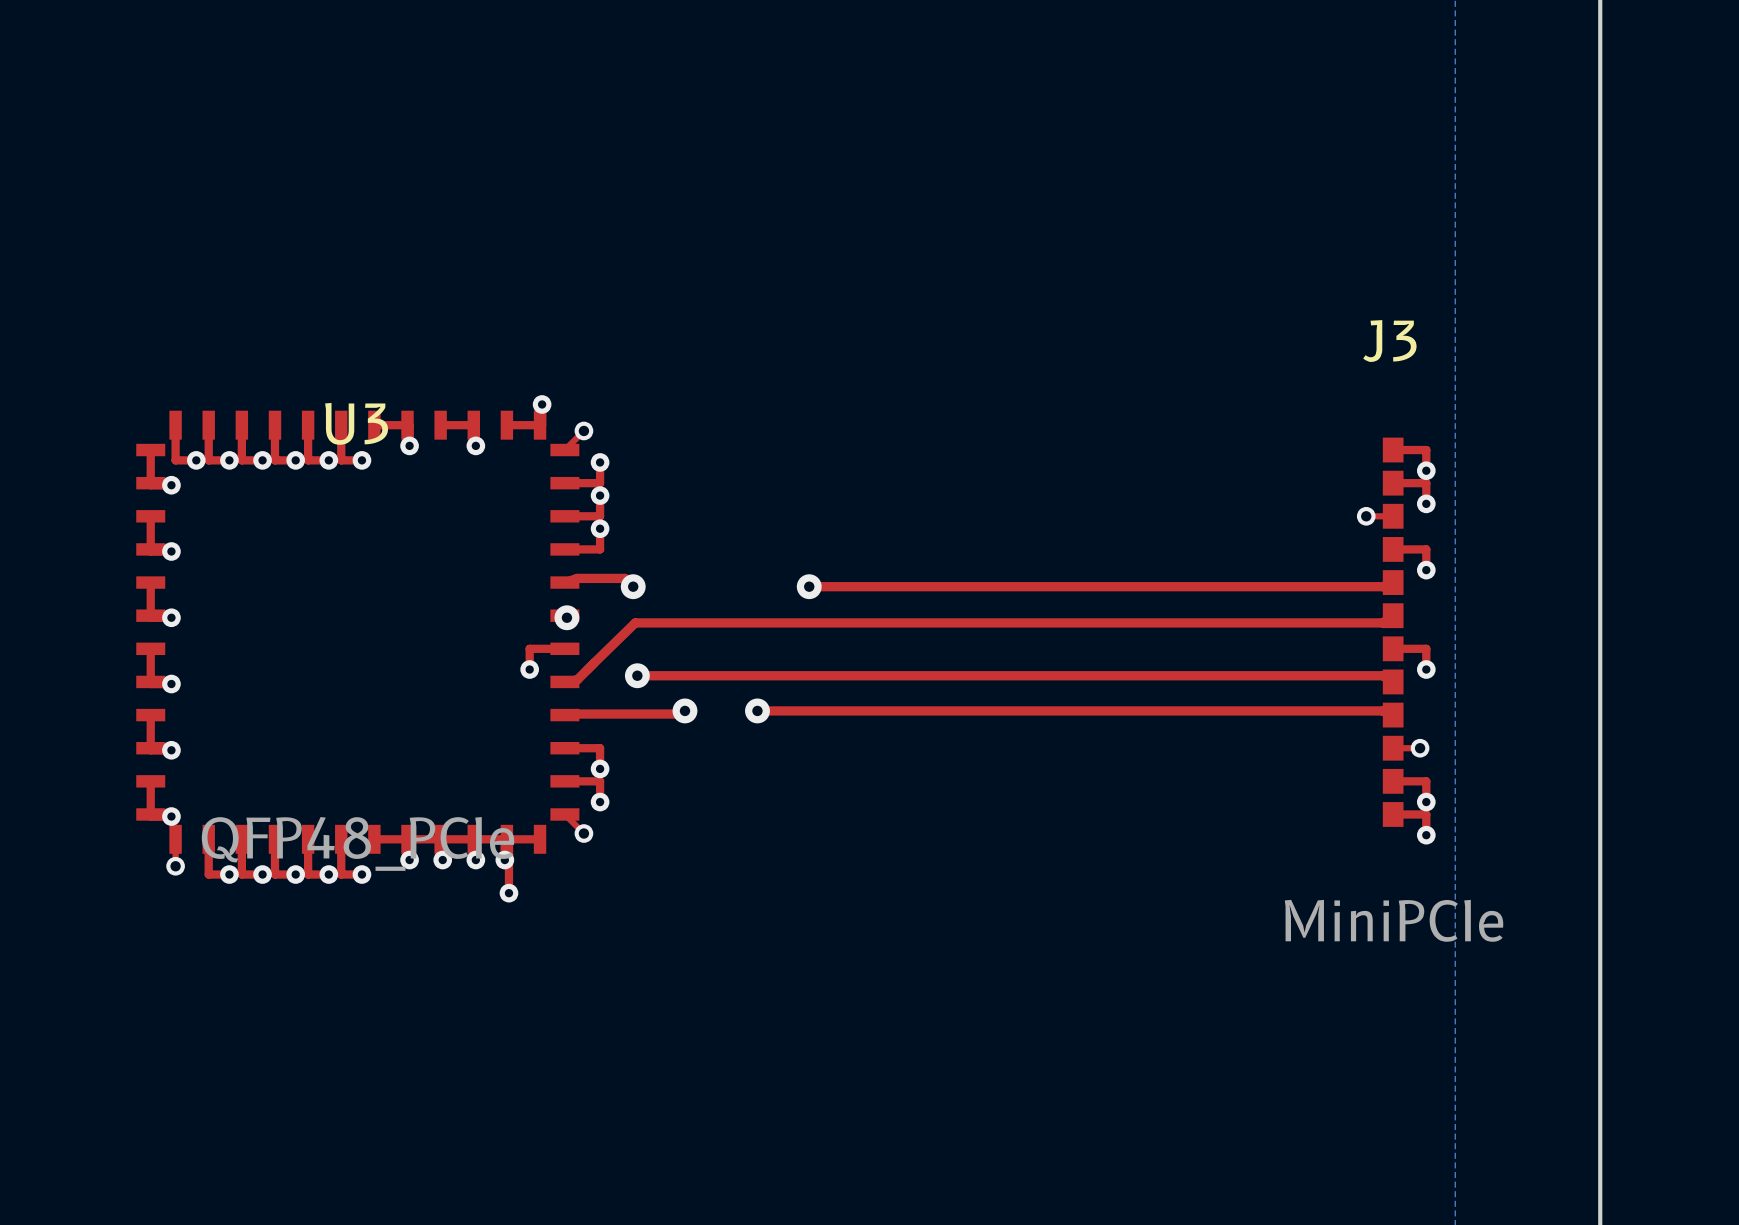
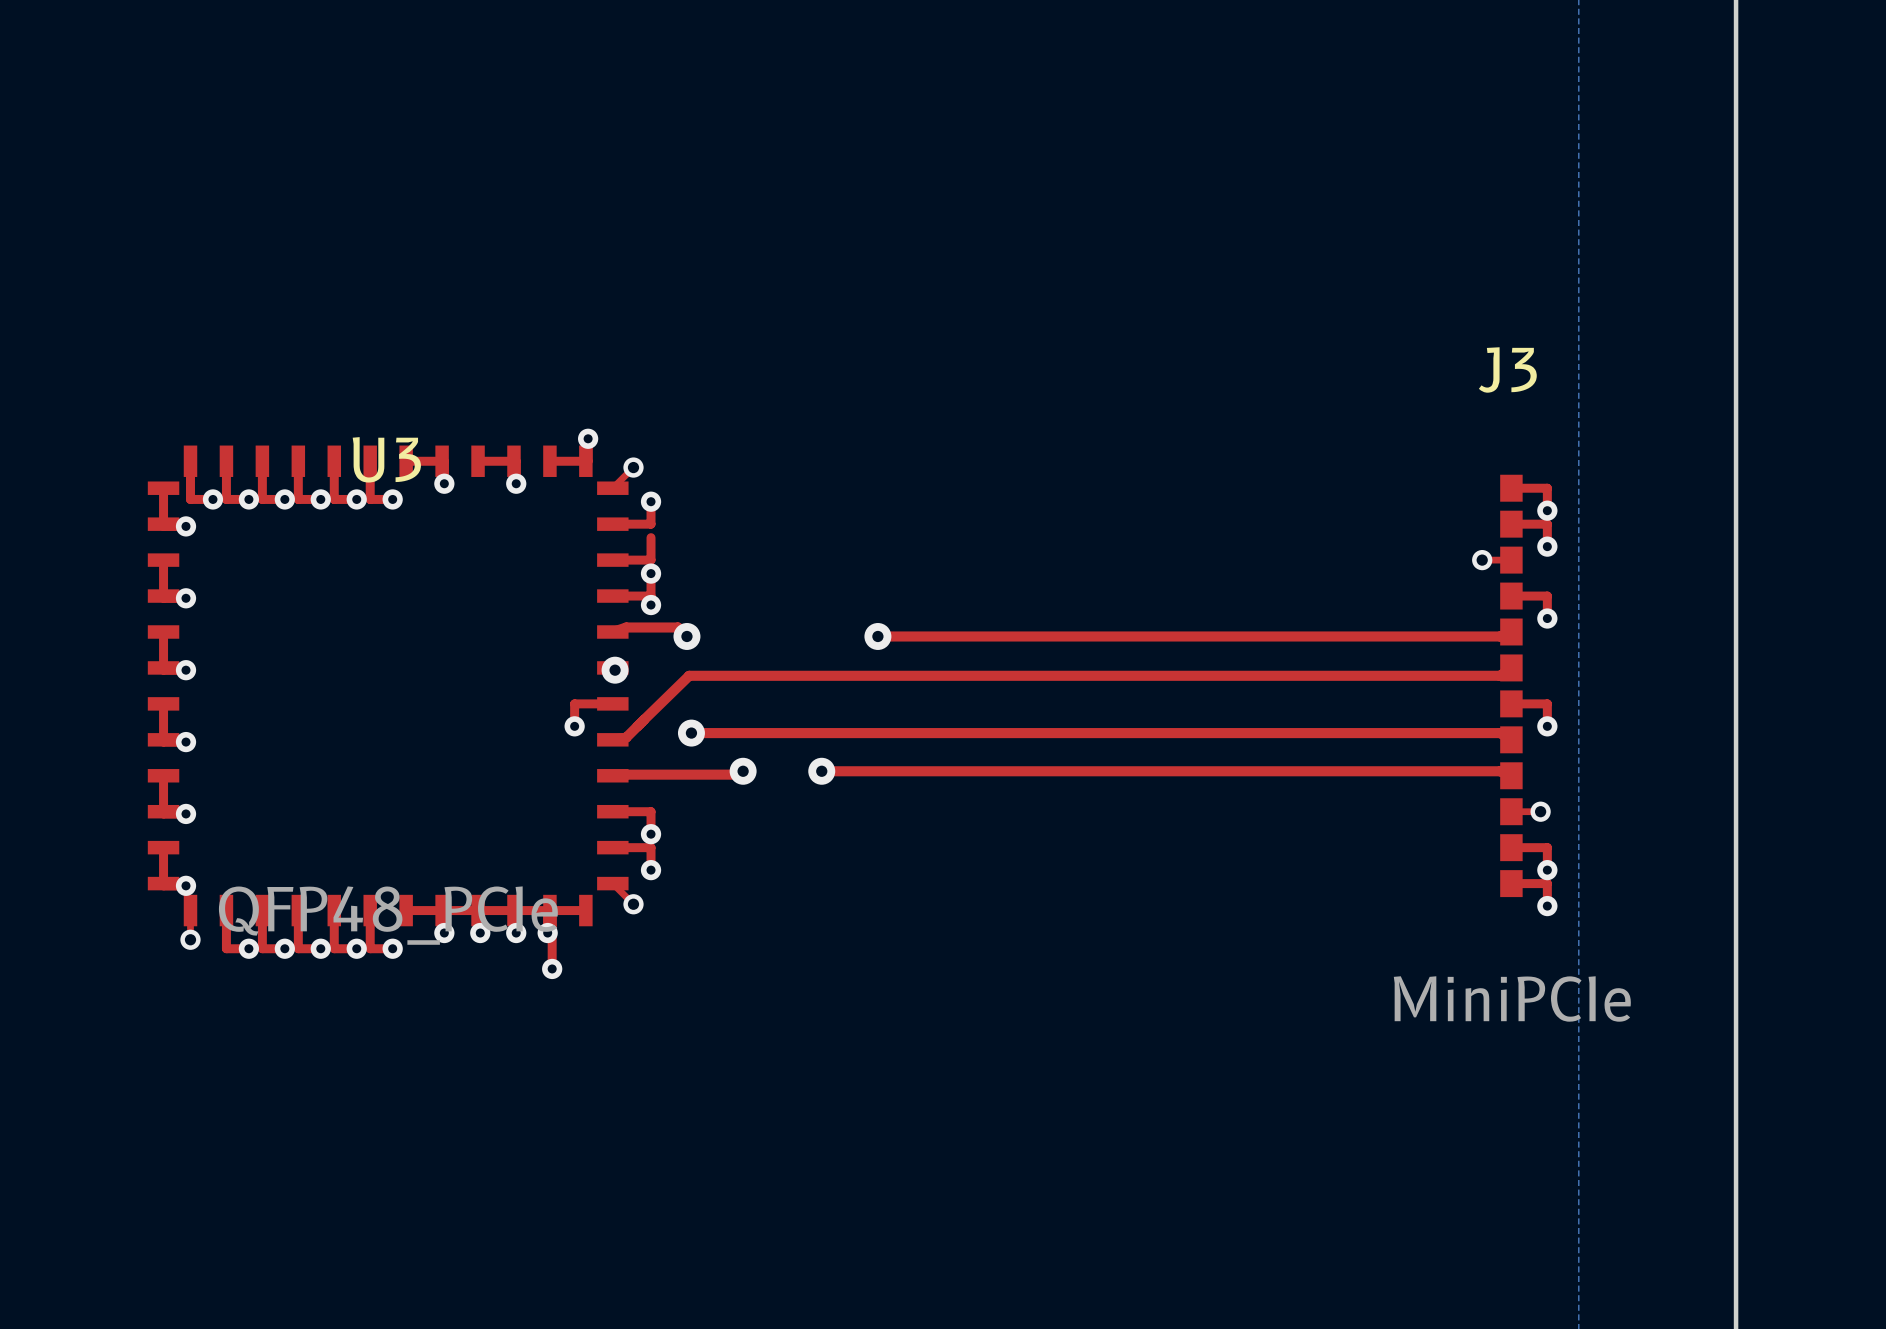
via position: (600, 495) -> (651, 605)

